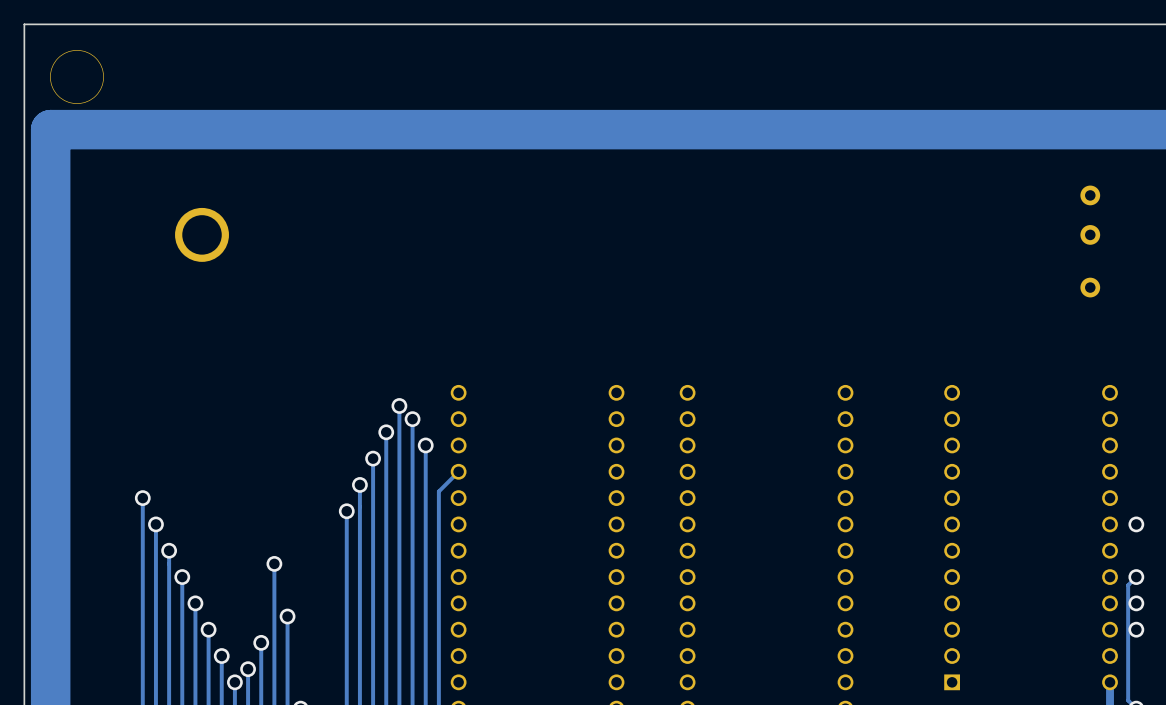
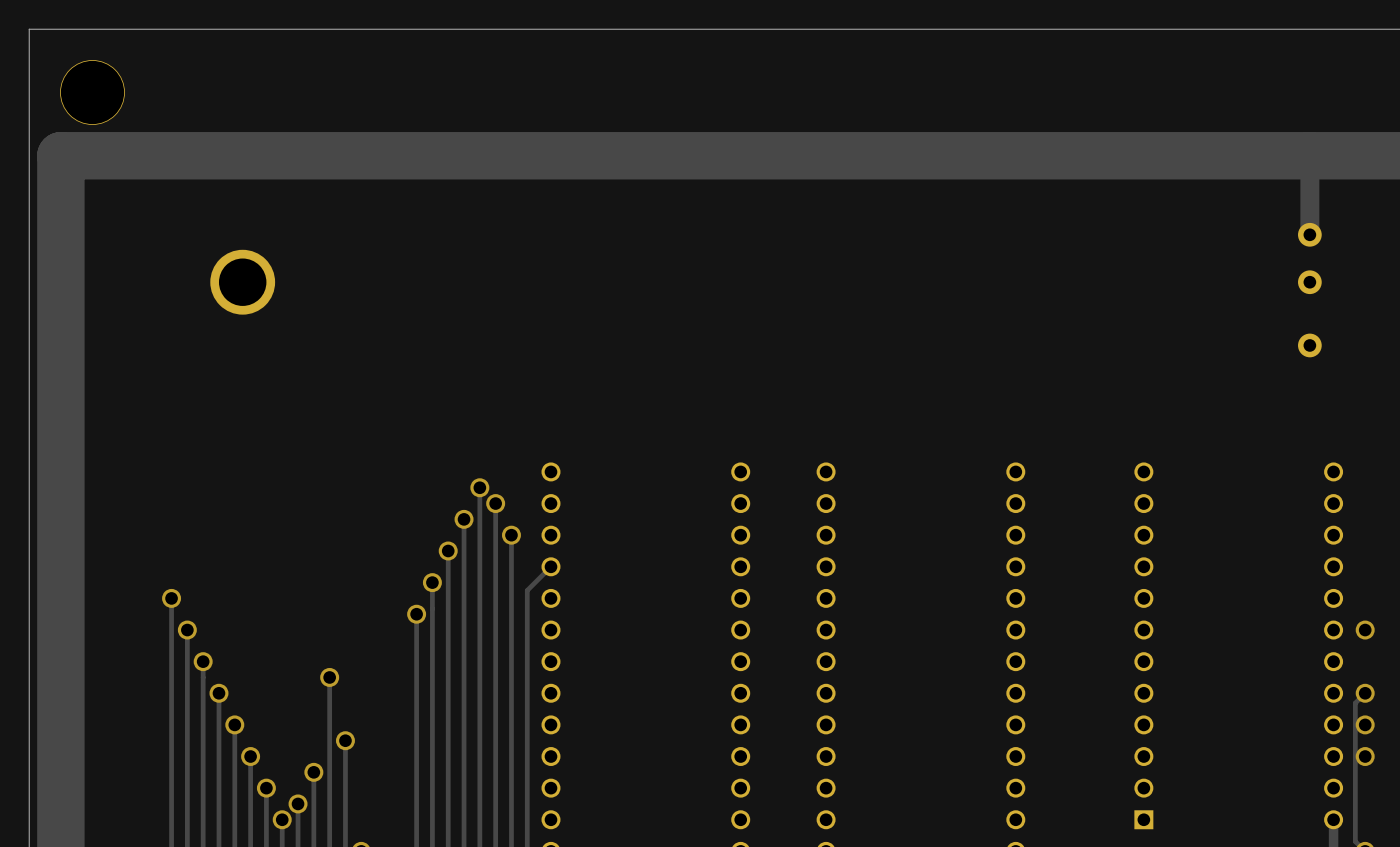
track: none -> (1309, 155) (1309, 234)

